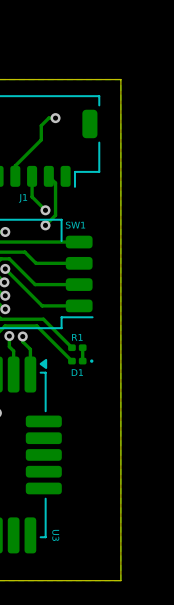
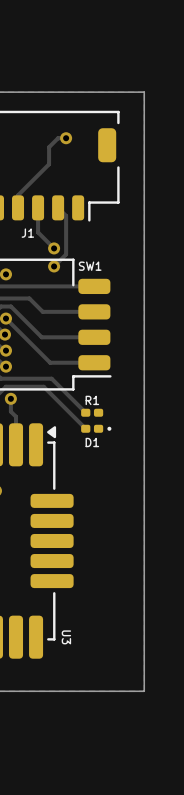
track: (22, 336) (22, 341) (30, 349) (30, 374) -> none
via: (22, 336) -> none
track: (82, 347) (82, 361) -> none

